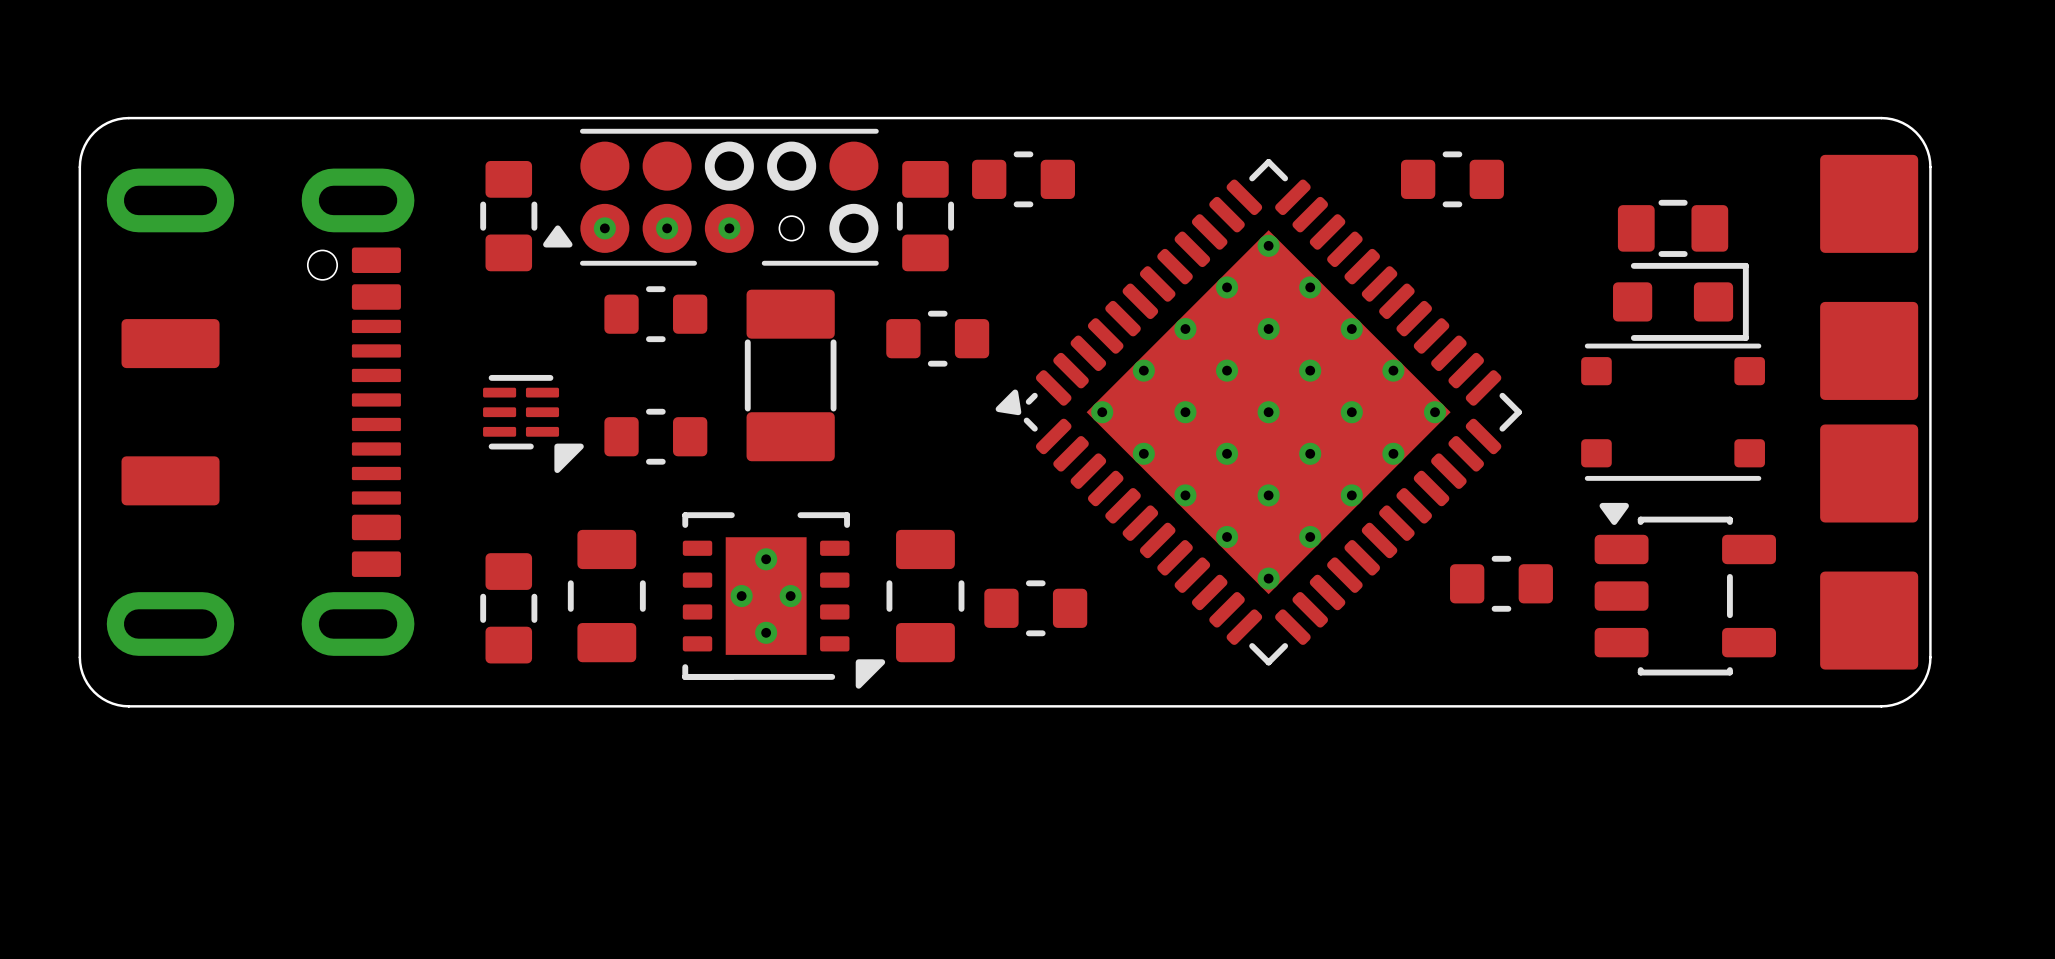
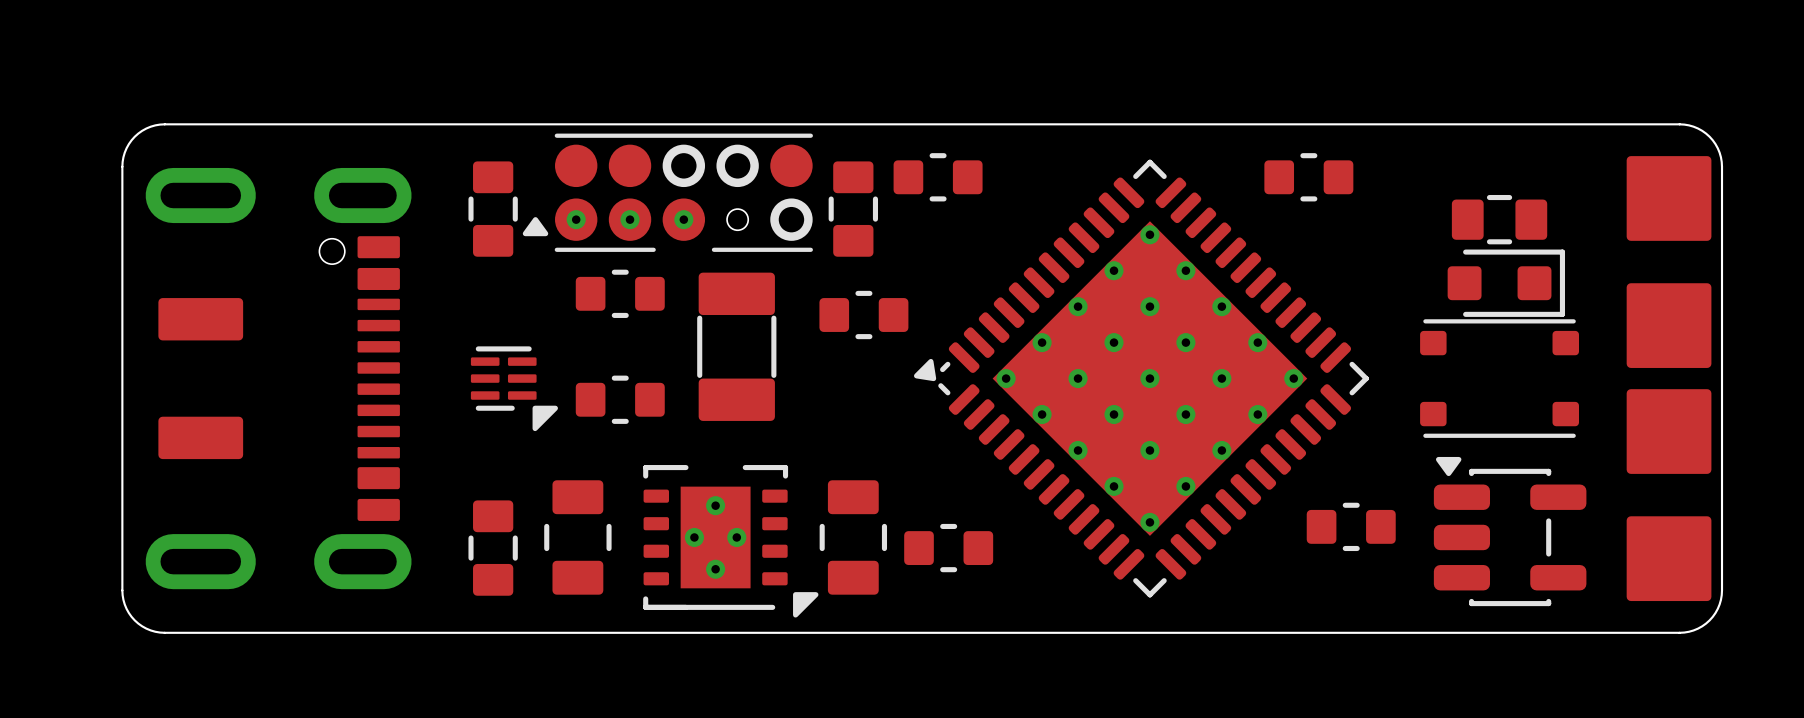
part footprint: [1594, 502, 1777, 676] -> [1433, 456, 1587, 607]

